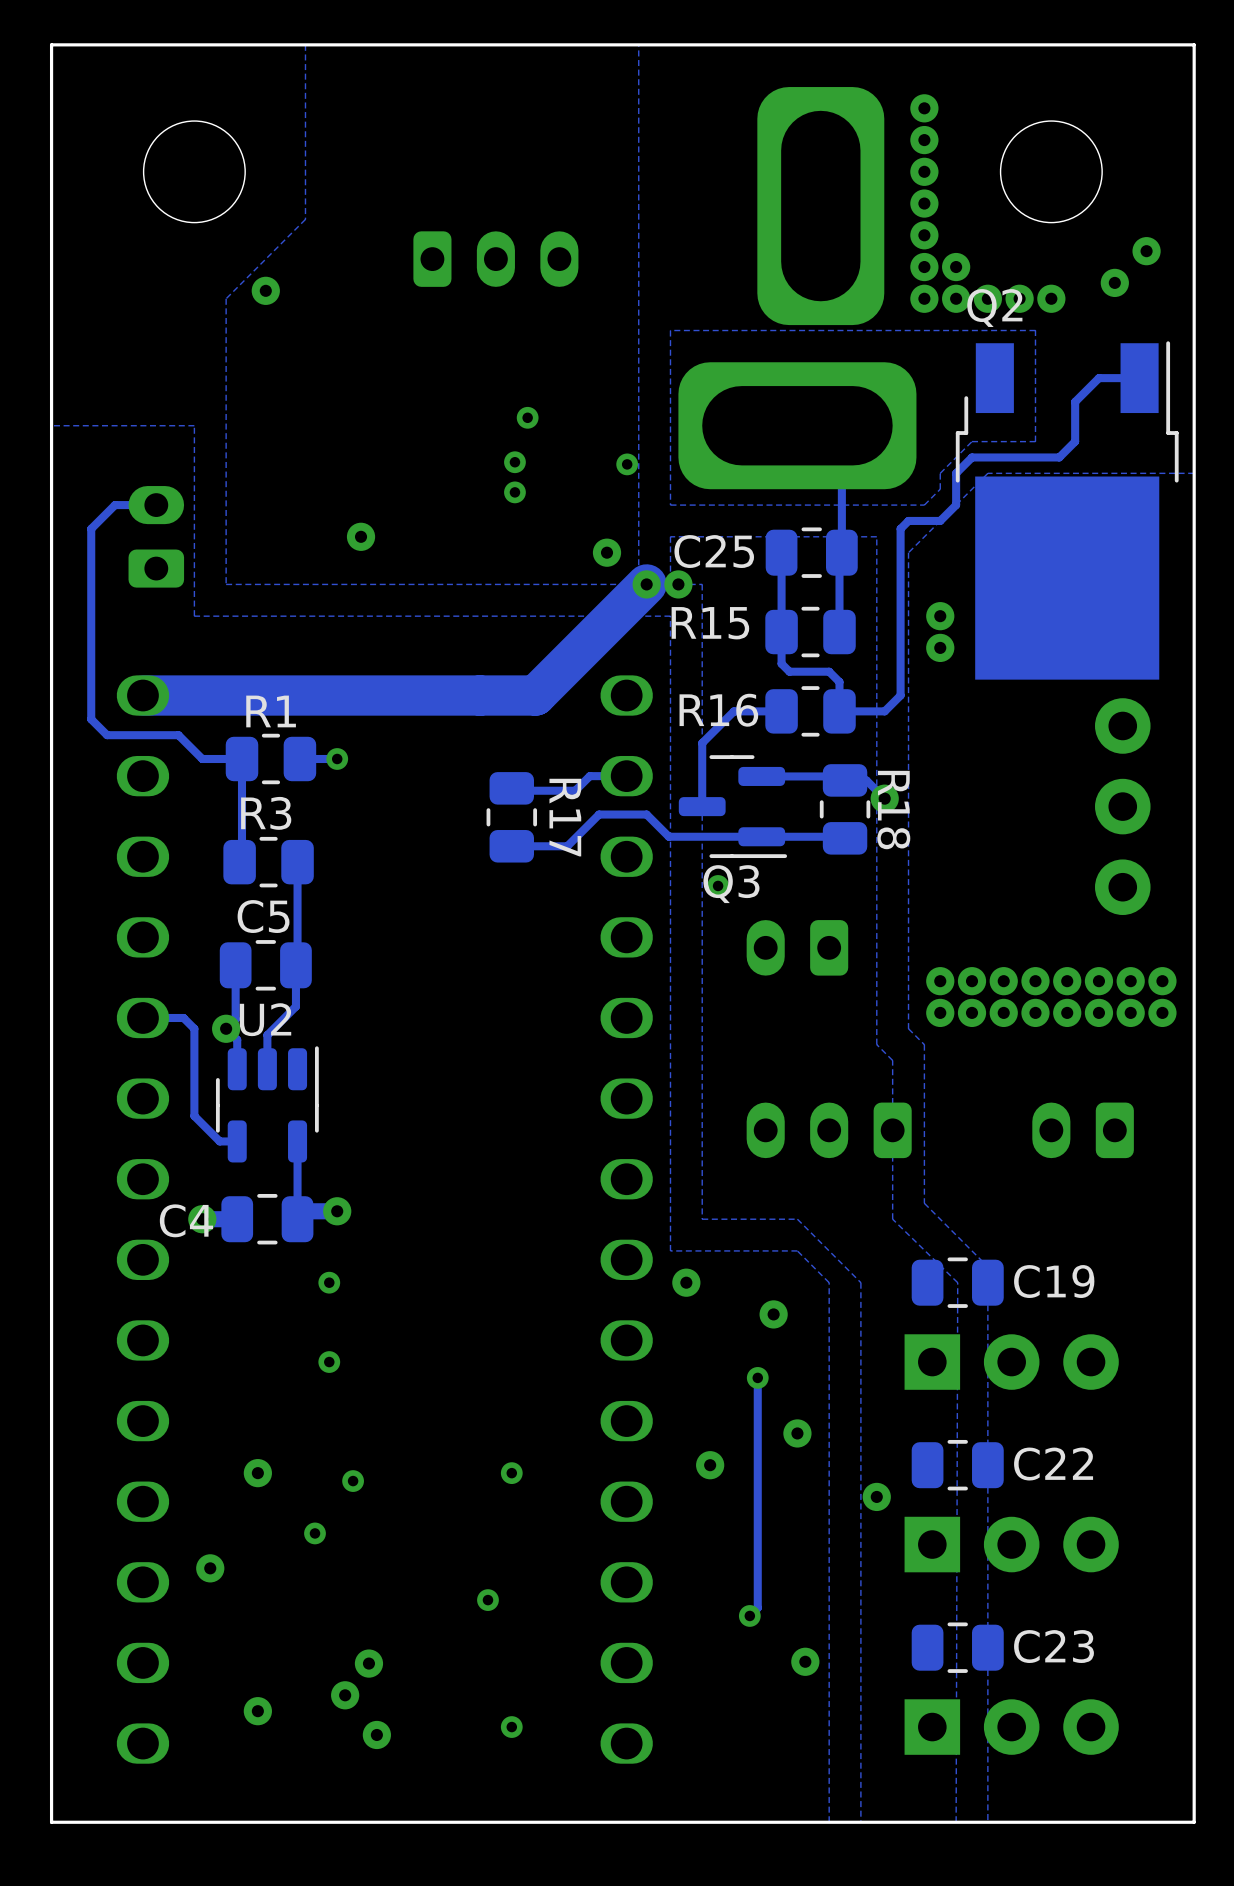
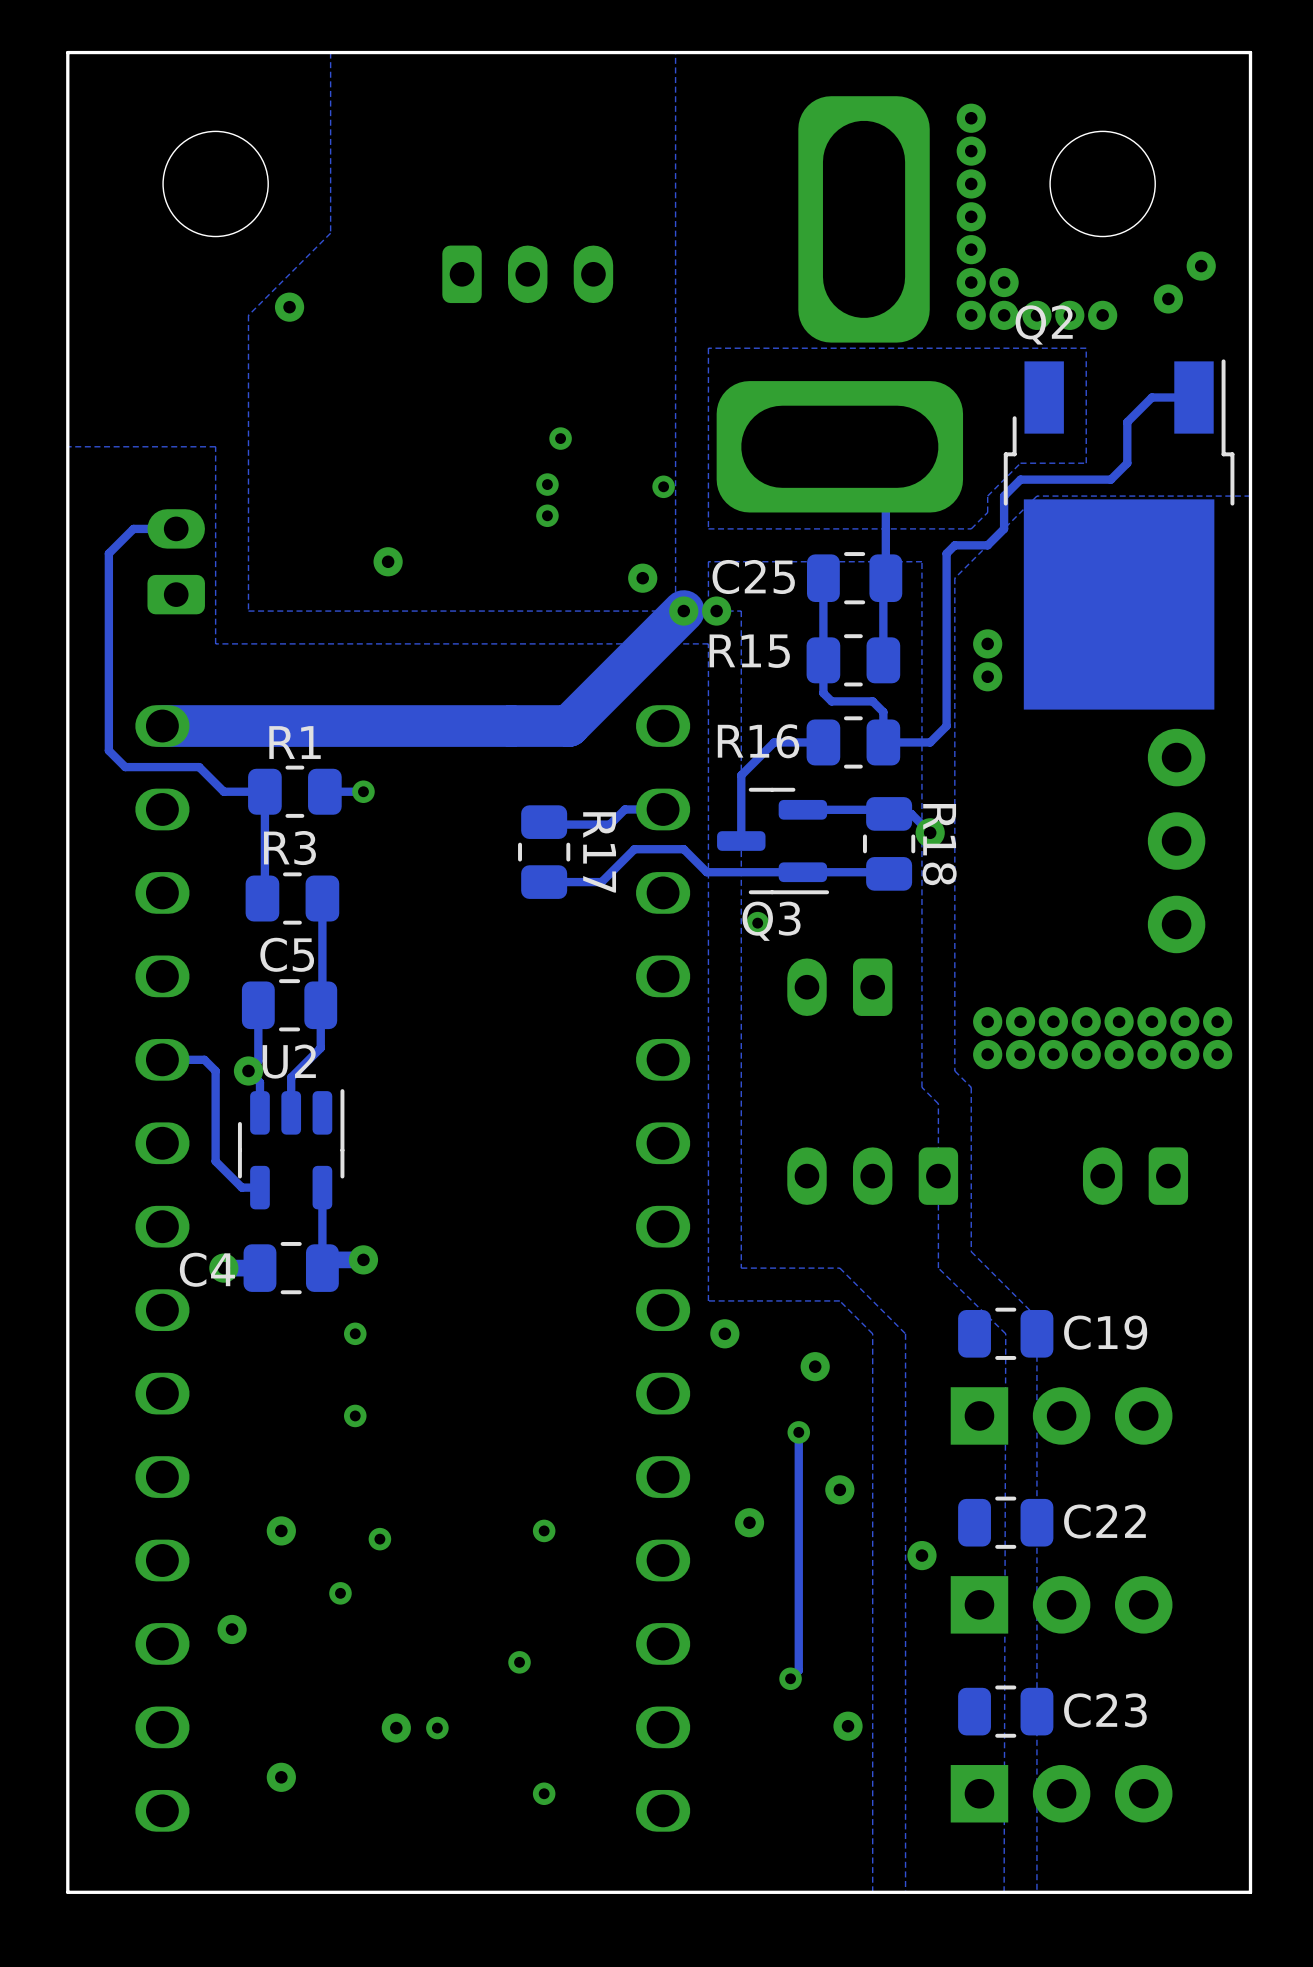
via: none -> (437, 1728)
via: (345, 1695) -> none
via: (376, 1734) -> none

